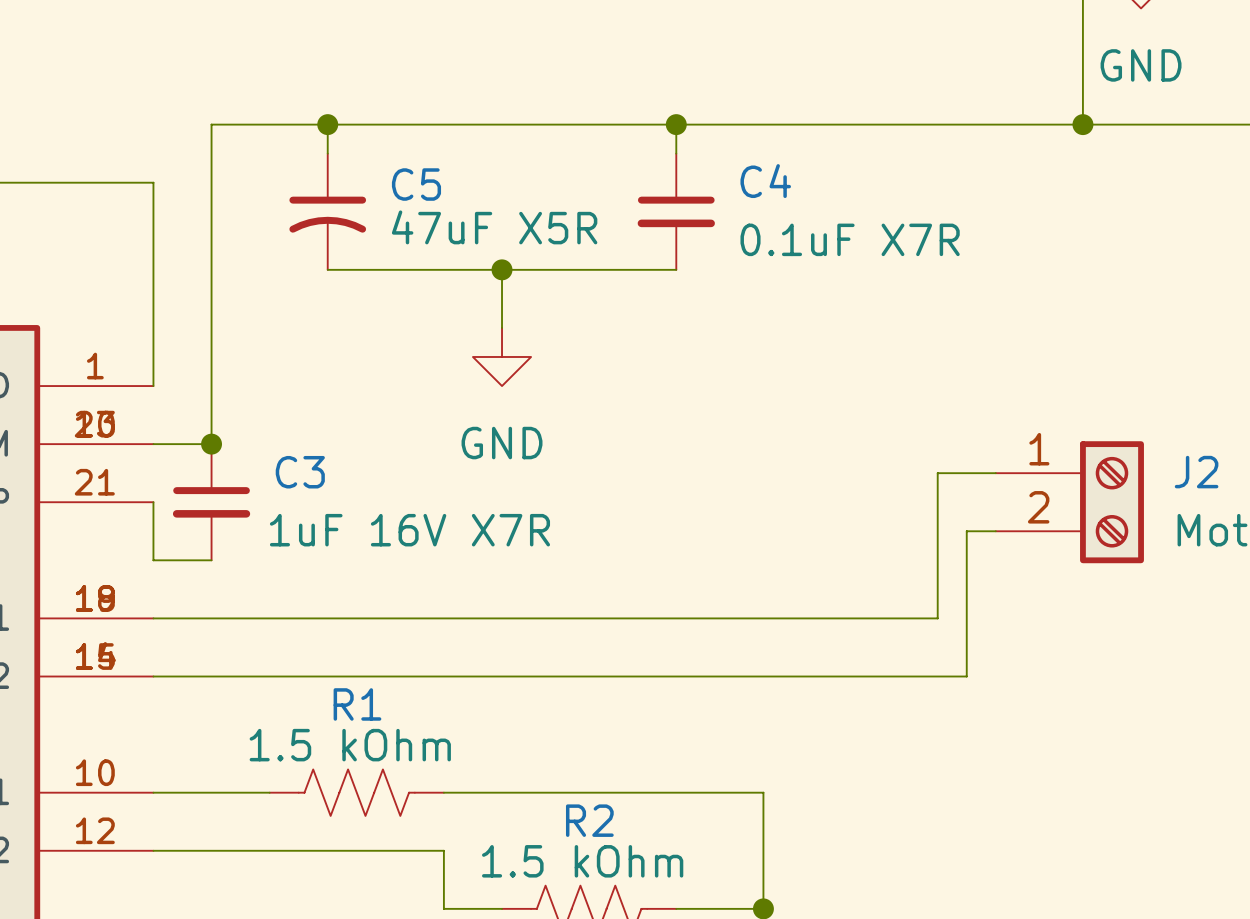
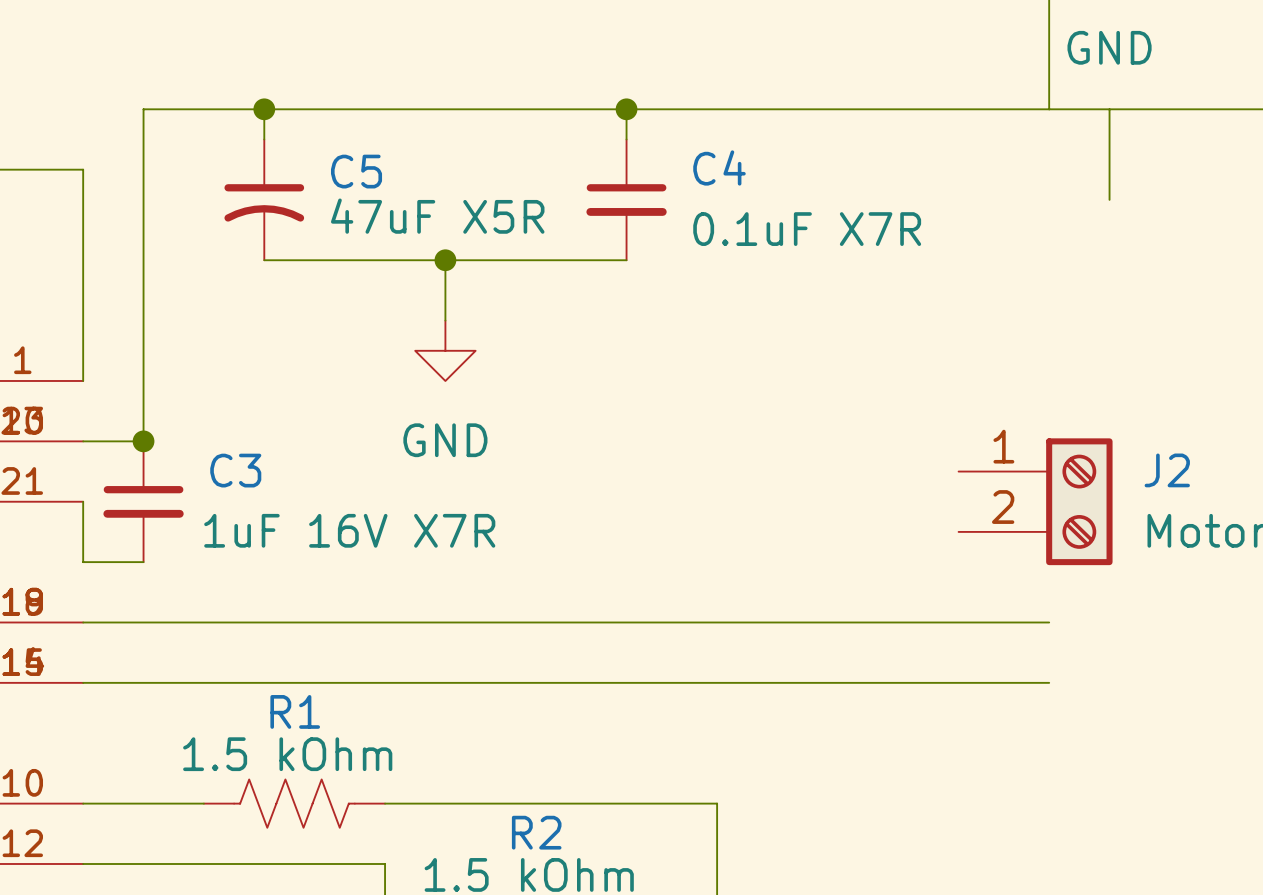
junction: (1082, 124) -> none
wire: none -> (1109, 109) (1109, 199)
wire: (995, 473) (937, 473) (937, 618) -> (1049, 622) (898, 622)
wire: (995, 531) (966, 531) (966, 676) -> (1049, 682) (928, 682)

